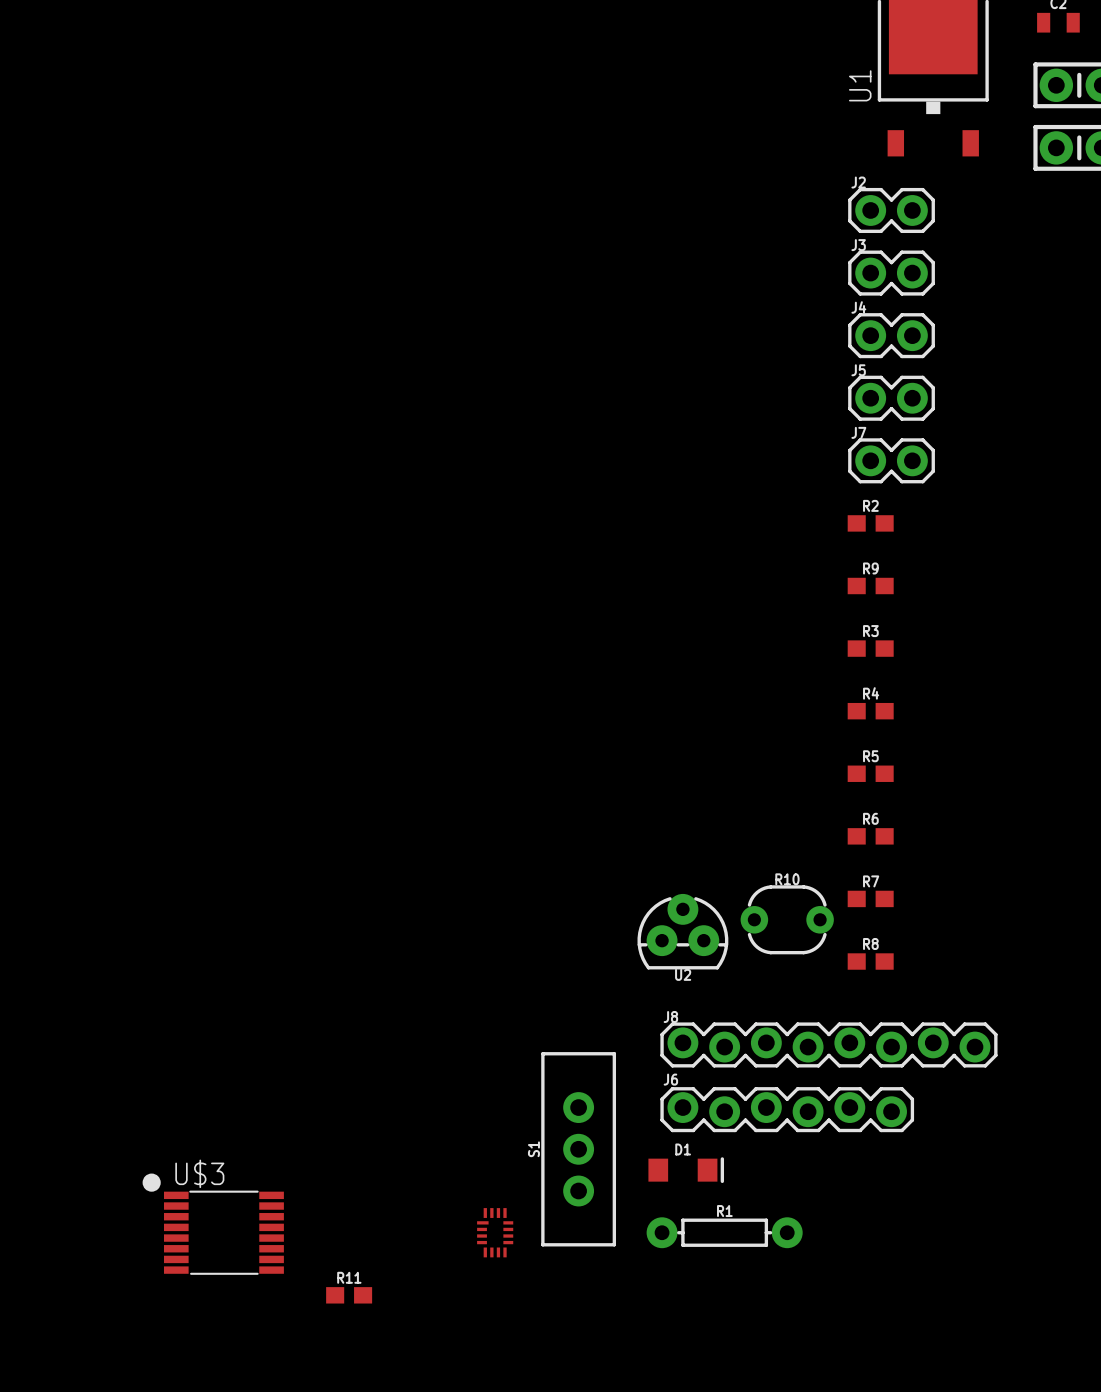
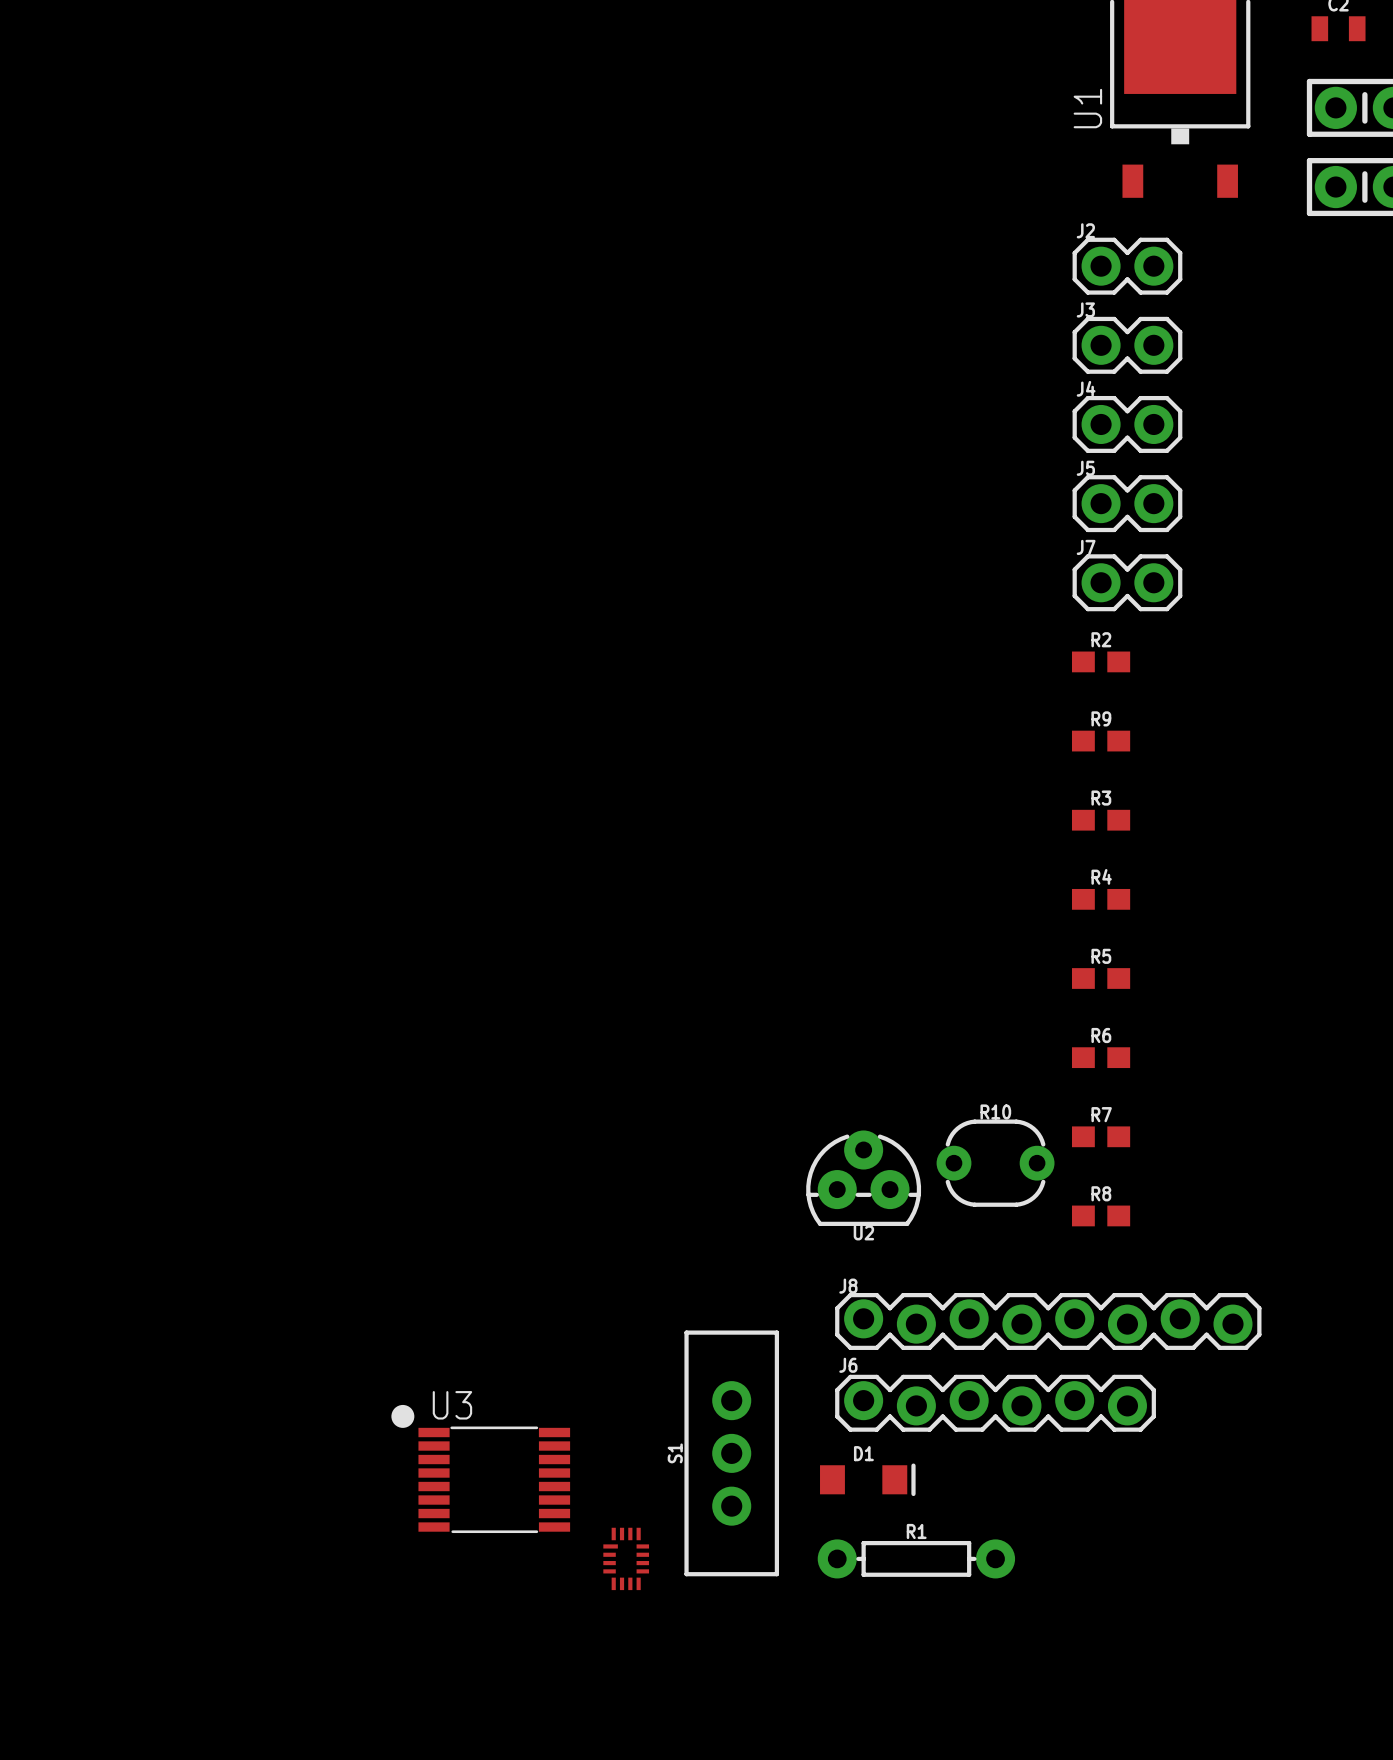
U3: none -> (480, 1468)
U$3: (213, 1224) -> none
R11: (349, 1295) -> none

